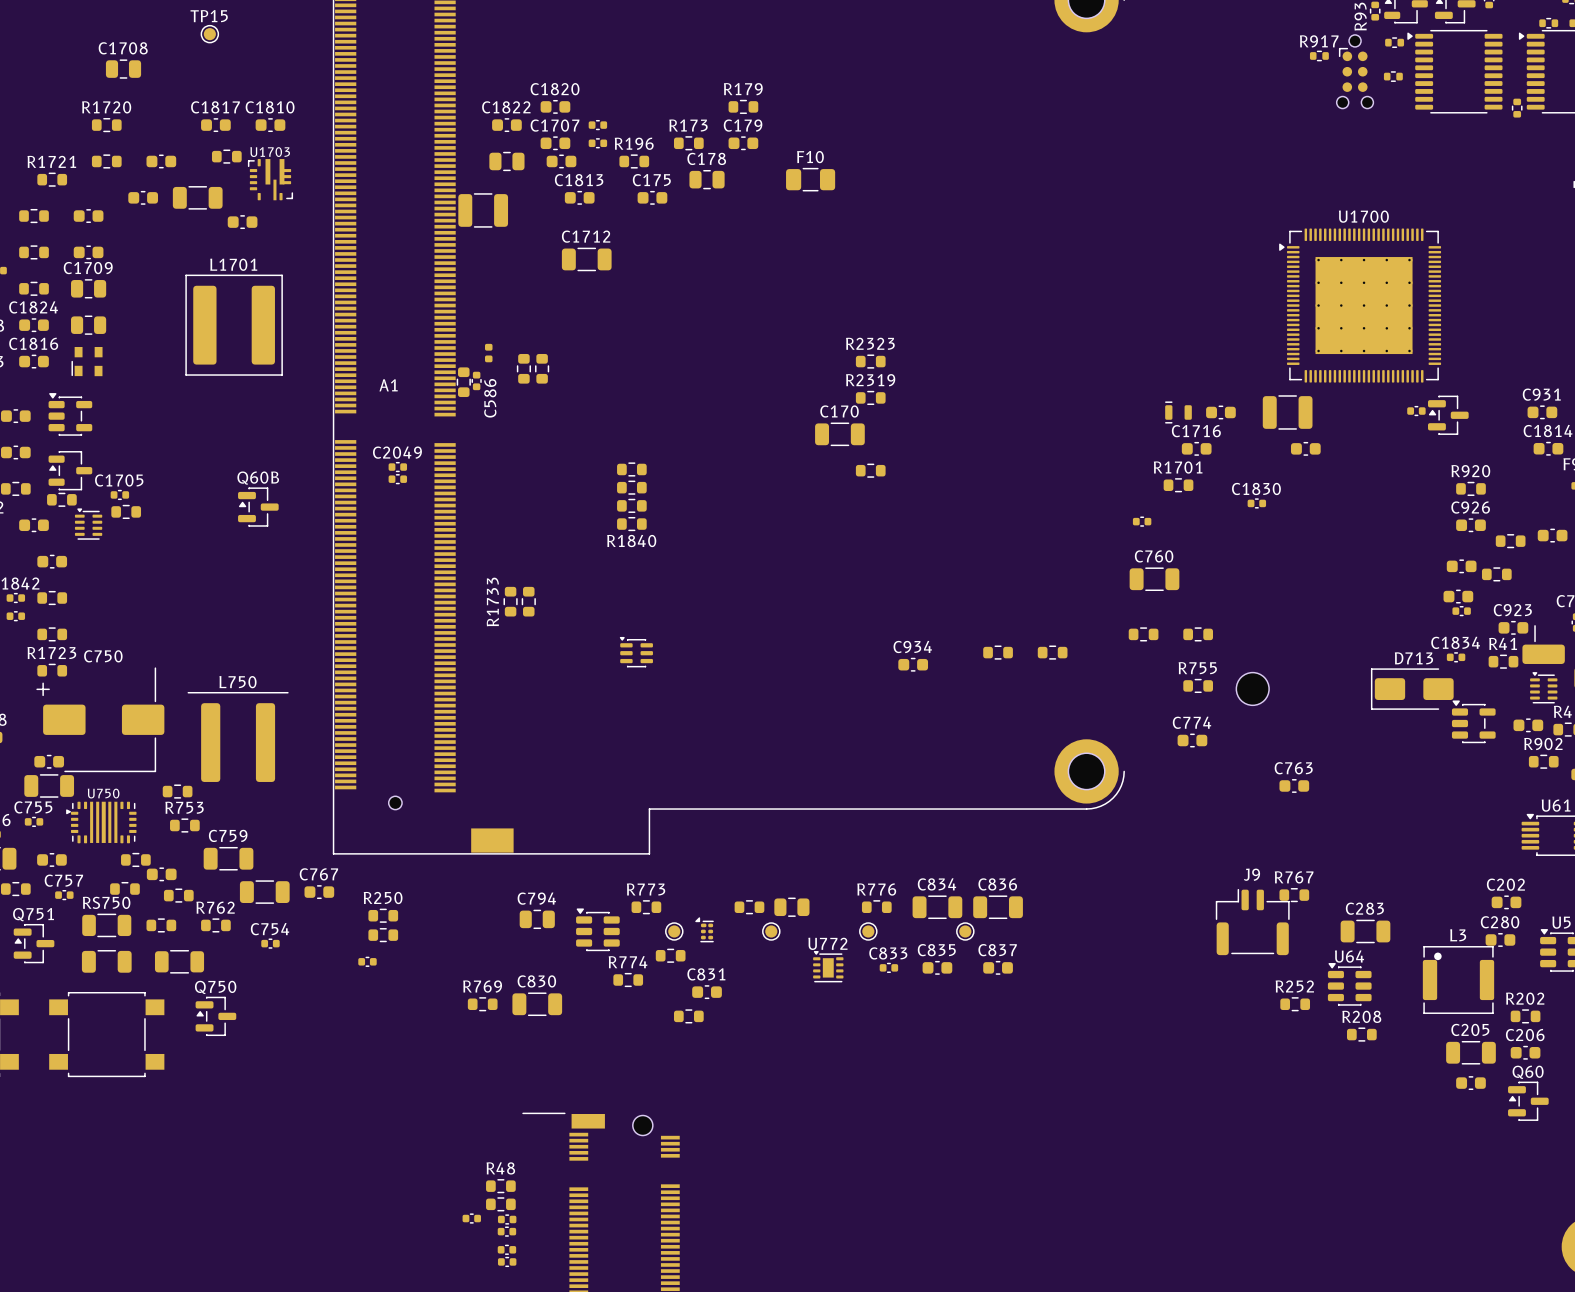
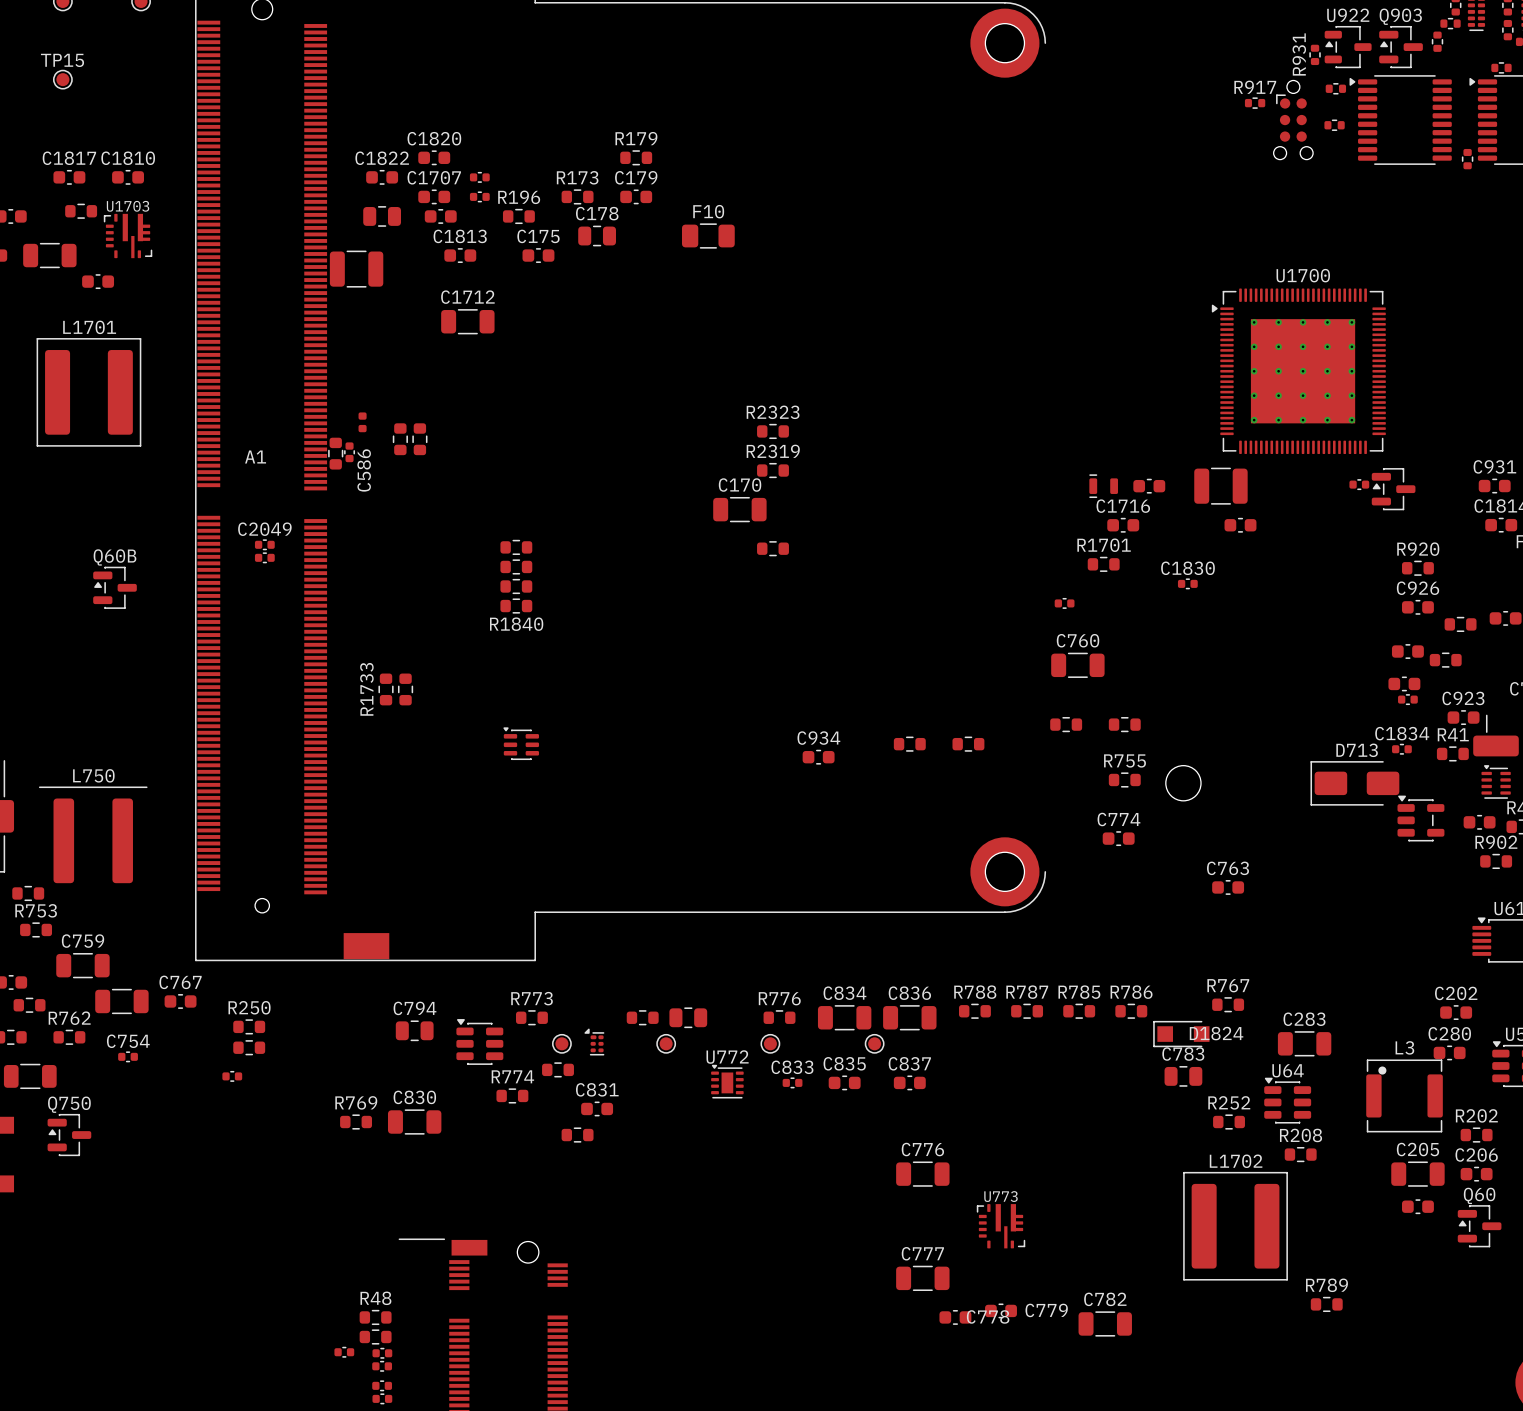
R788: none -> (974, 1011)
R787: none -> (1027, 1011)
R785: none -> (1079, 1011)
R786: none -> (1131, 1011)
D1824: none -> (1181, 1034)
J9: (1252, 922) -> none
C783: none -> (1183, 1076)
C776: none -> (922, 1174)
U773: none -> (1001, 1226)
L1702: none -> (1235, 1226)
C777: none -> (922, 1278)
R789: none -> (1326, 1304)
C779: none -> (1001, 1310)
C778: none -> (955, 1317)
C782: none -> (1105, 1323)

